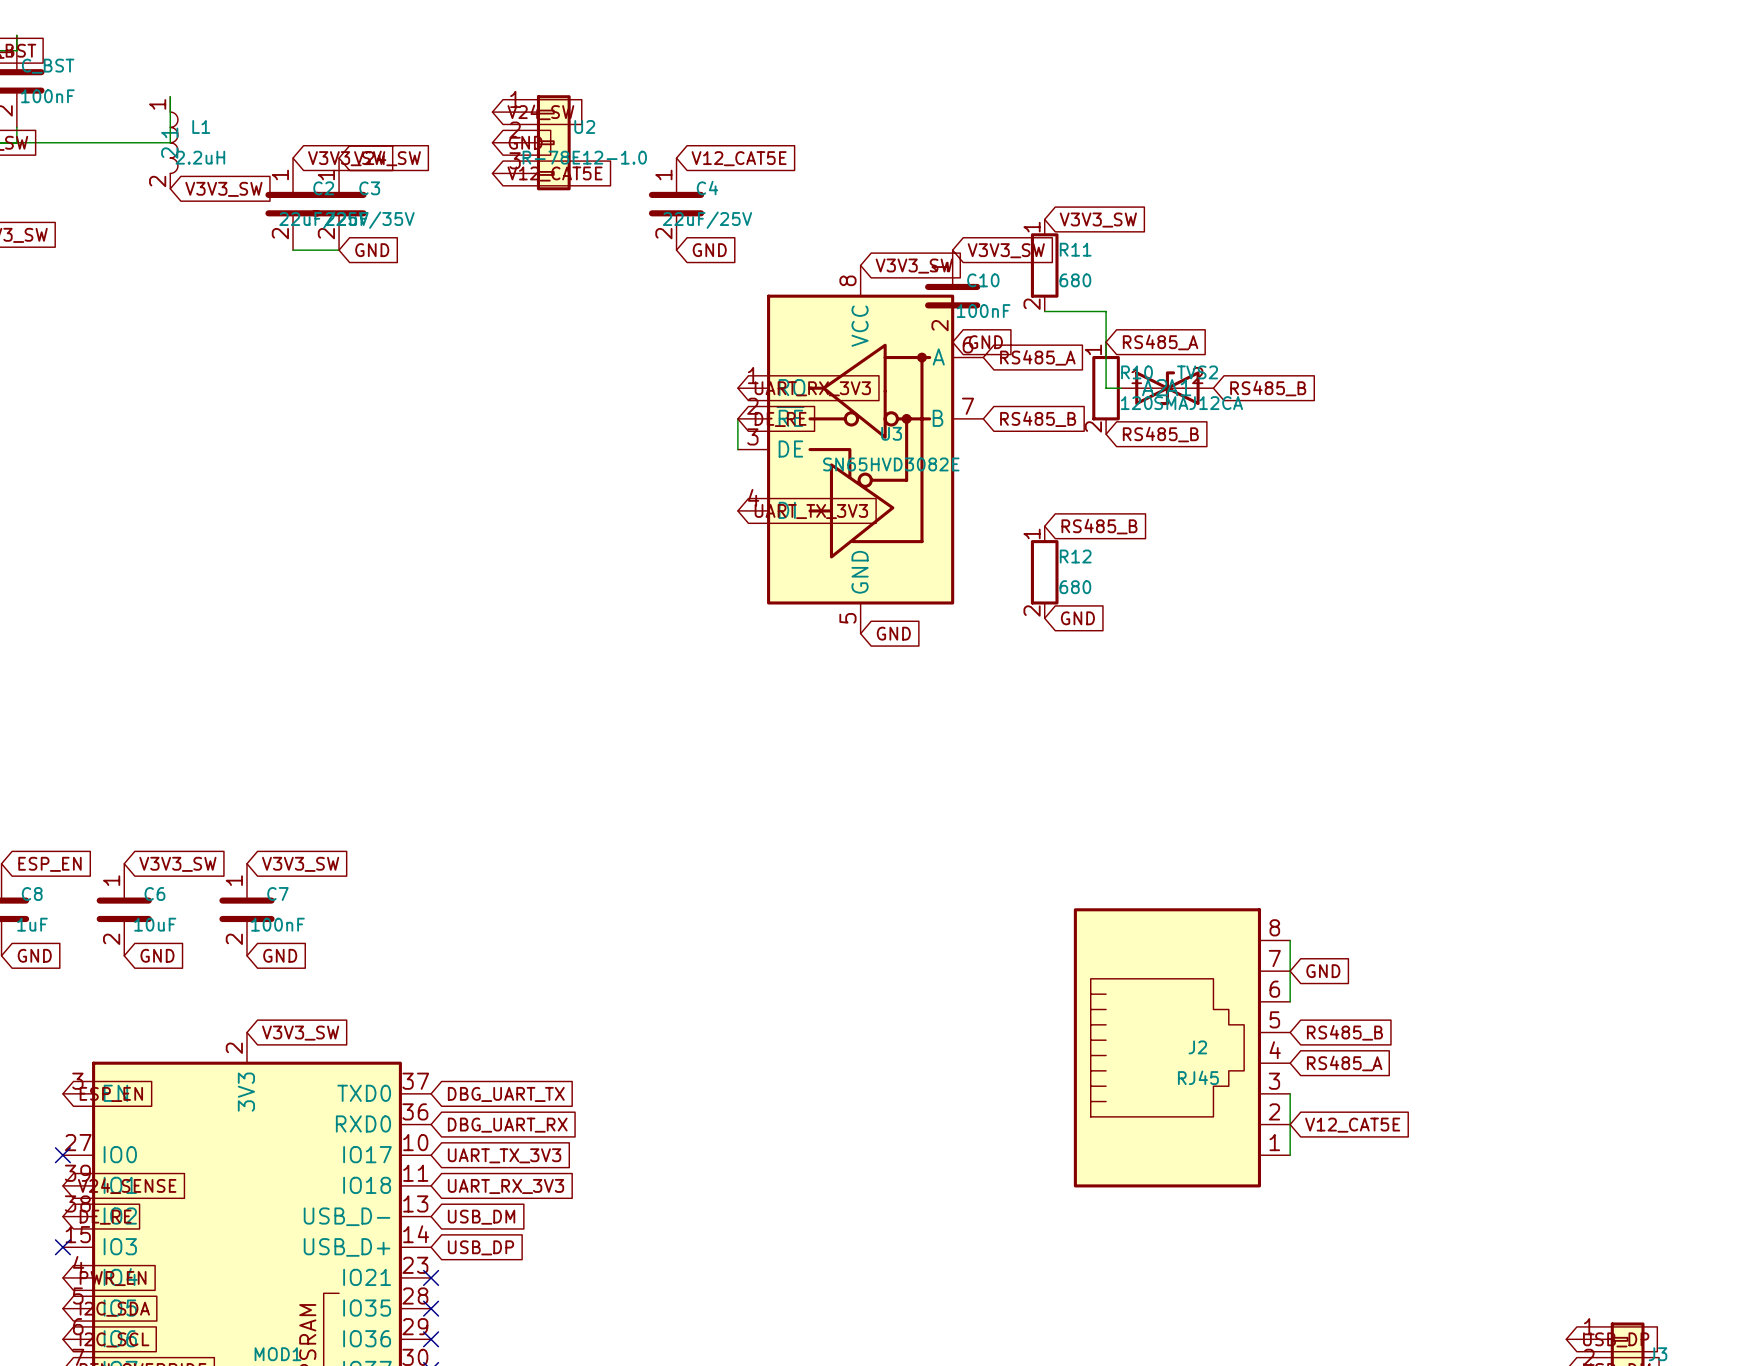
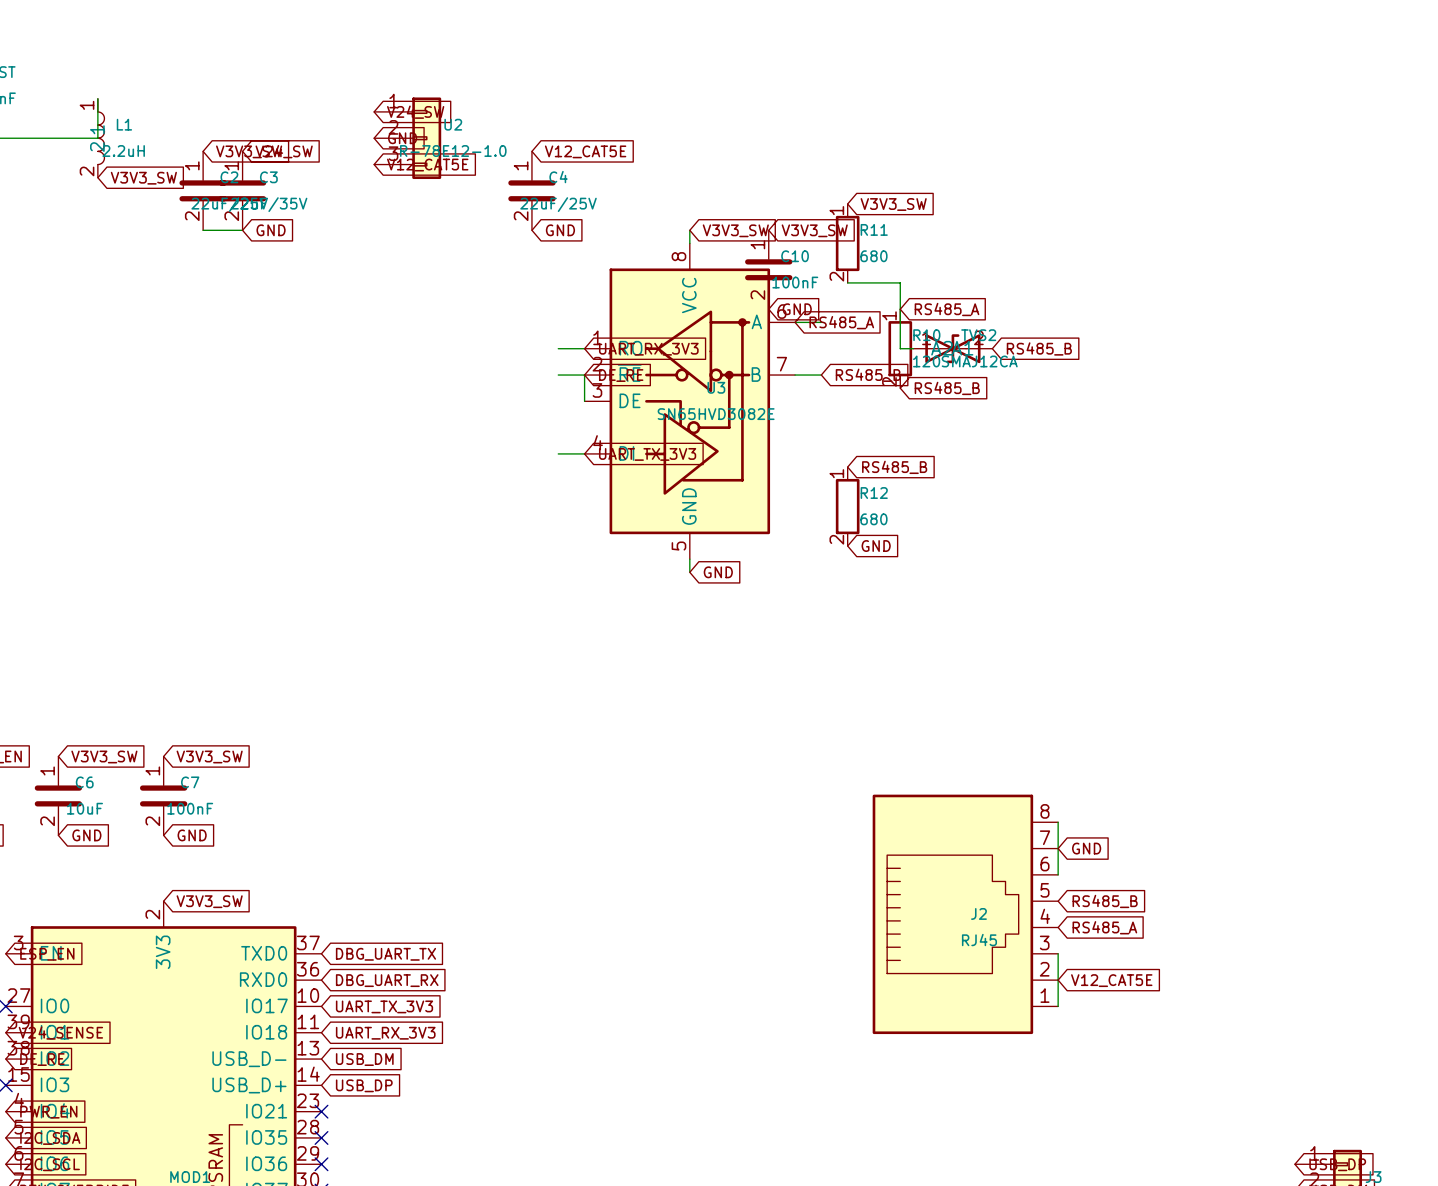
wire: none -> (689, 230) (689, 243)
global label position: V3V3_SW (914, 266) -> V3V3_SW (735, 230)
wire: none -> (795, 322) (821, 322)
wire: none -> (558, 348) (584, 348)
wire: none -> (558, 375) (584, 375)
wire: none -> (795, 375) (821, 375)
global label position: RS485_B (1038, 419) -> RS485_B (868, 375)
wire: none -> (558, 453) (584, 453)
wire: none -> (689, 559) (689, 572)
global label position: GND (893, 633) -> GND (718, 572)

